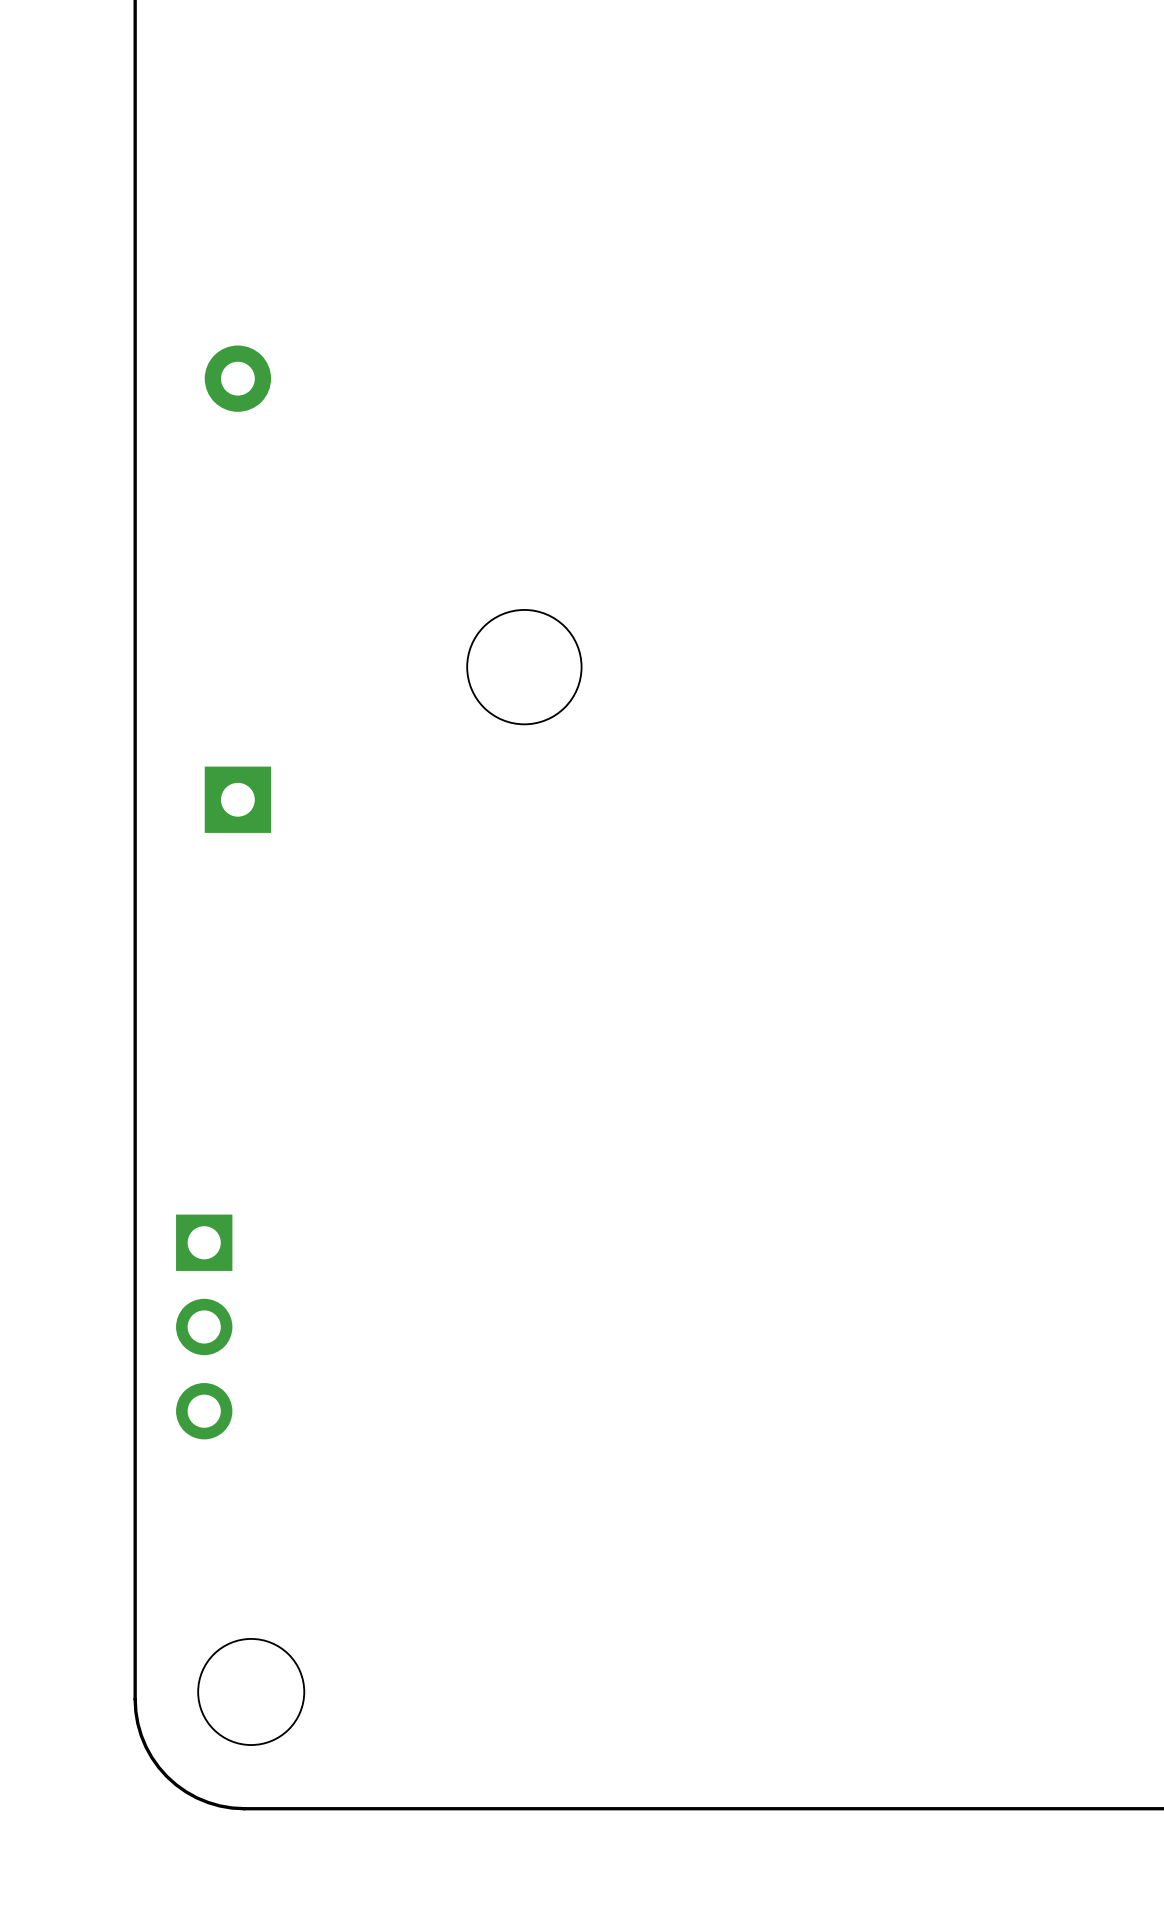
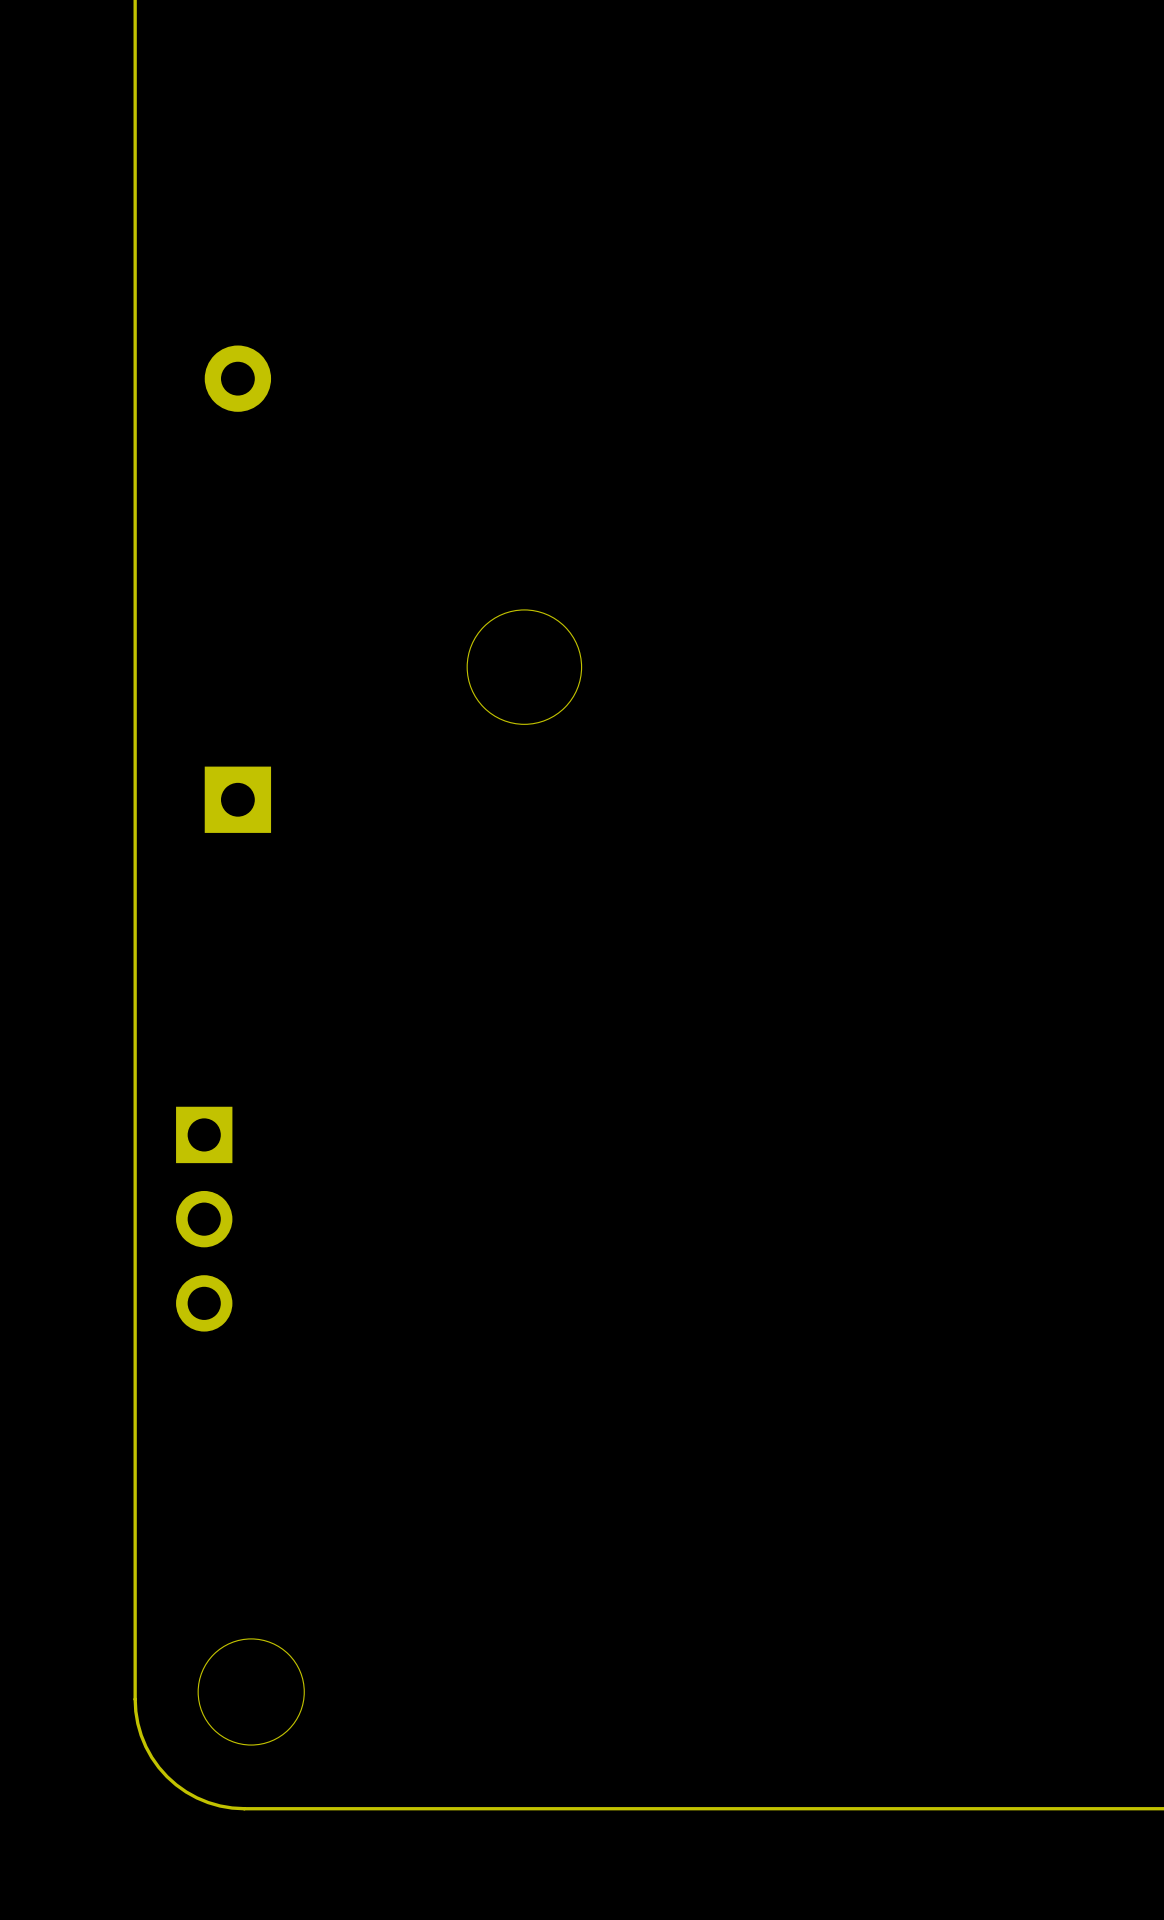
part position: (204, 1326) -> (204, 1219)

